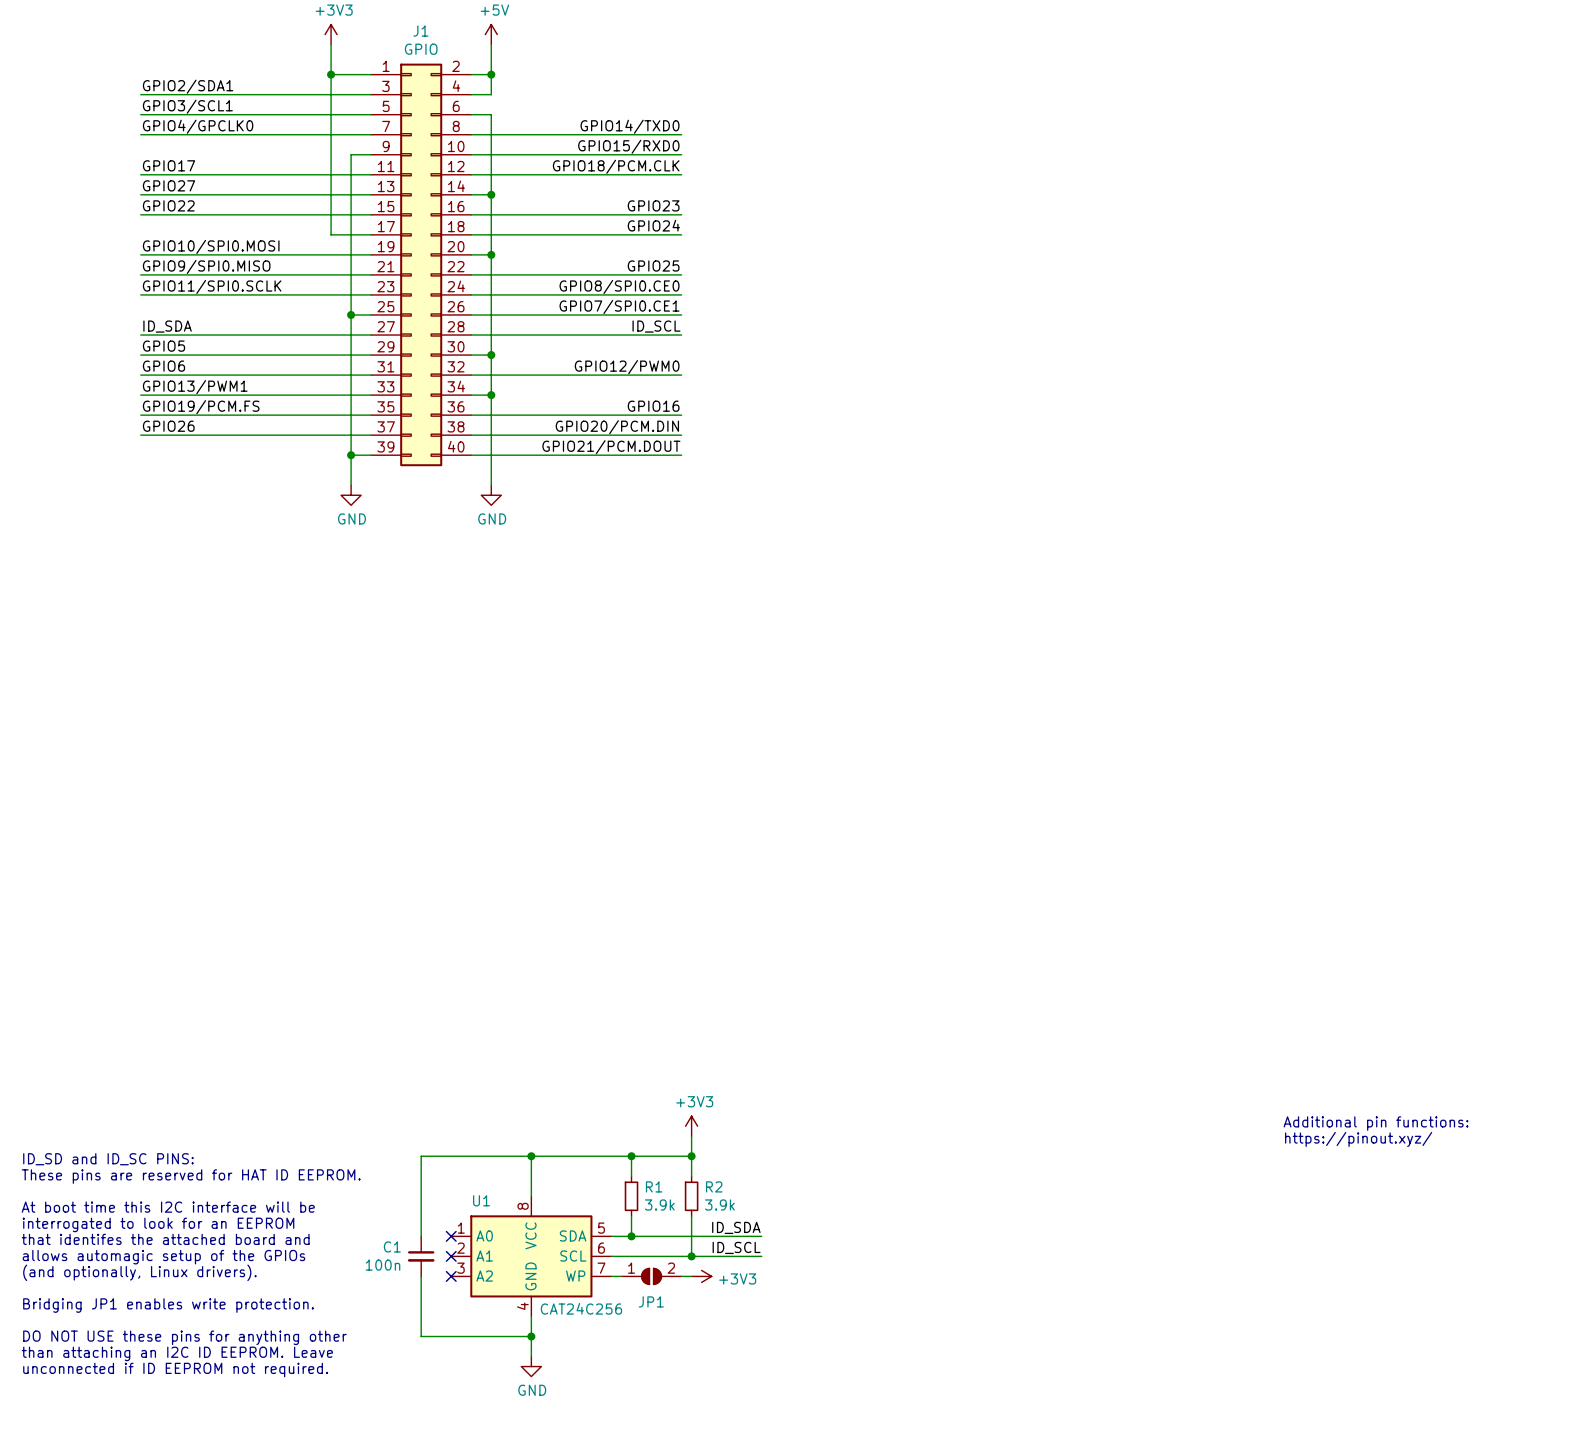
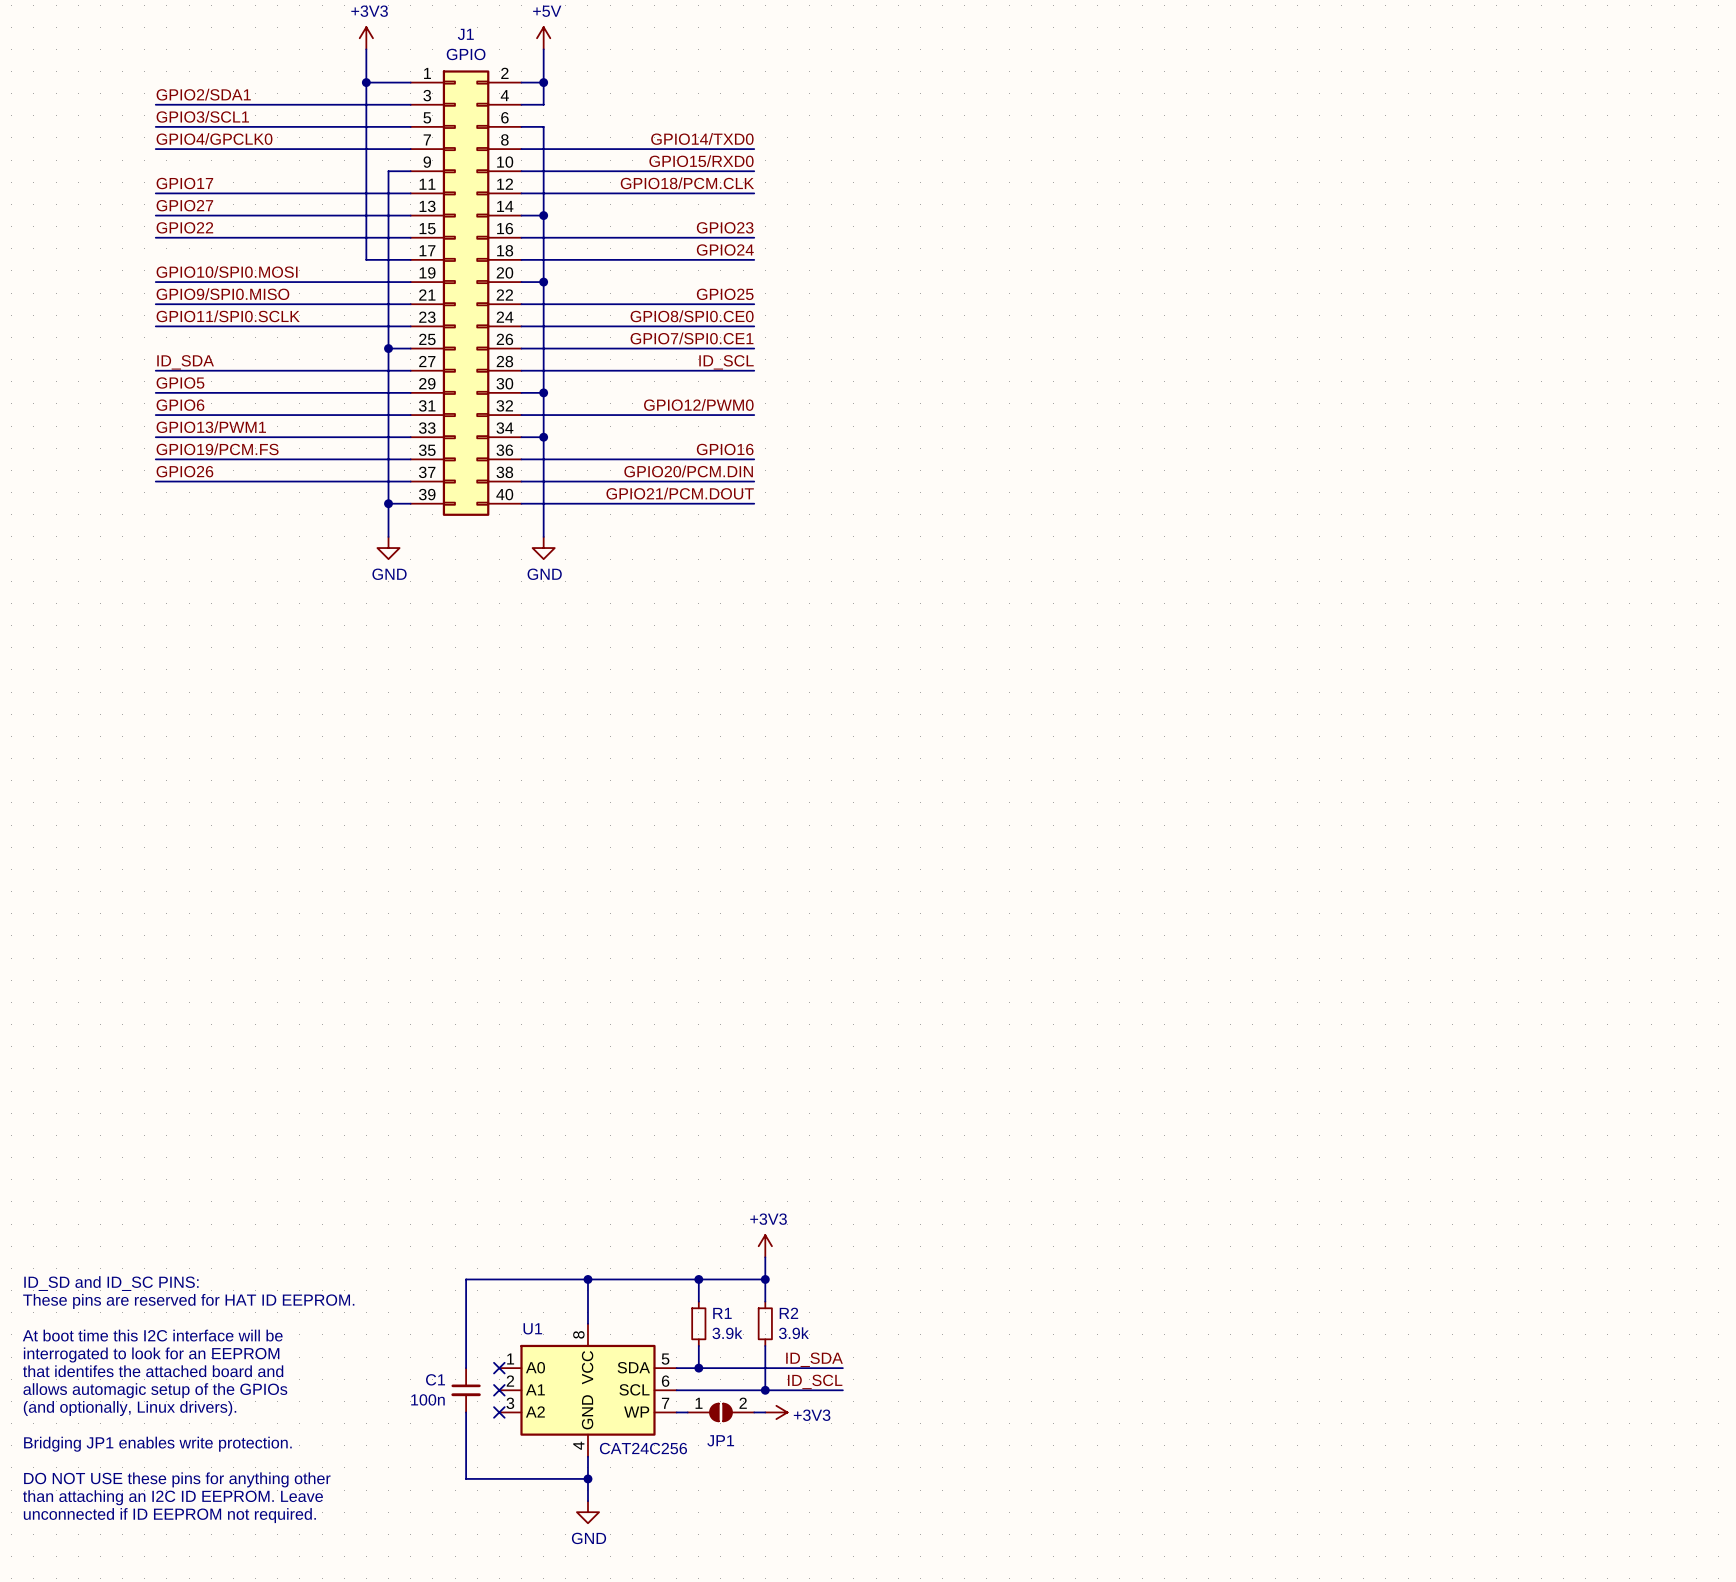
text: Additional pin functions: (1376, 1123) -> none
text: https://pinout.xyz/ (1358, 1139) -> none

